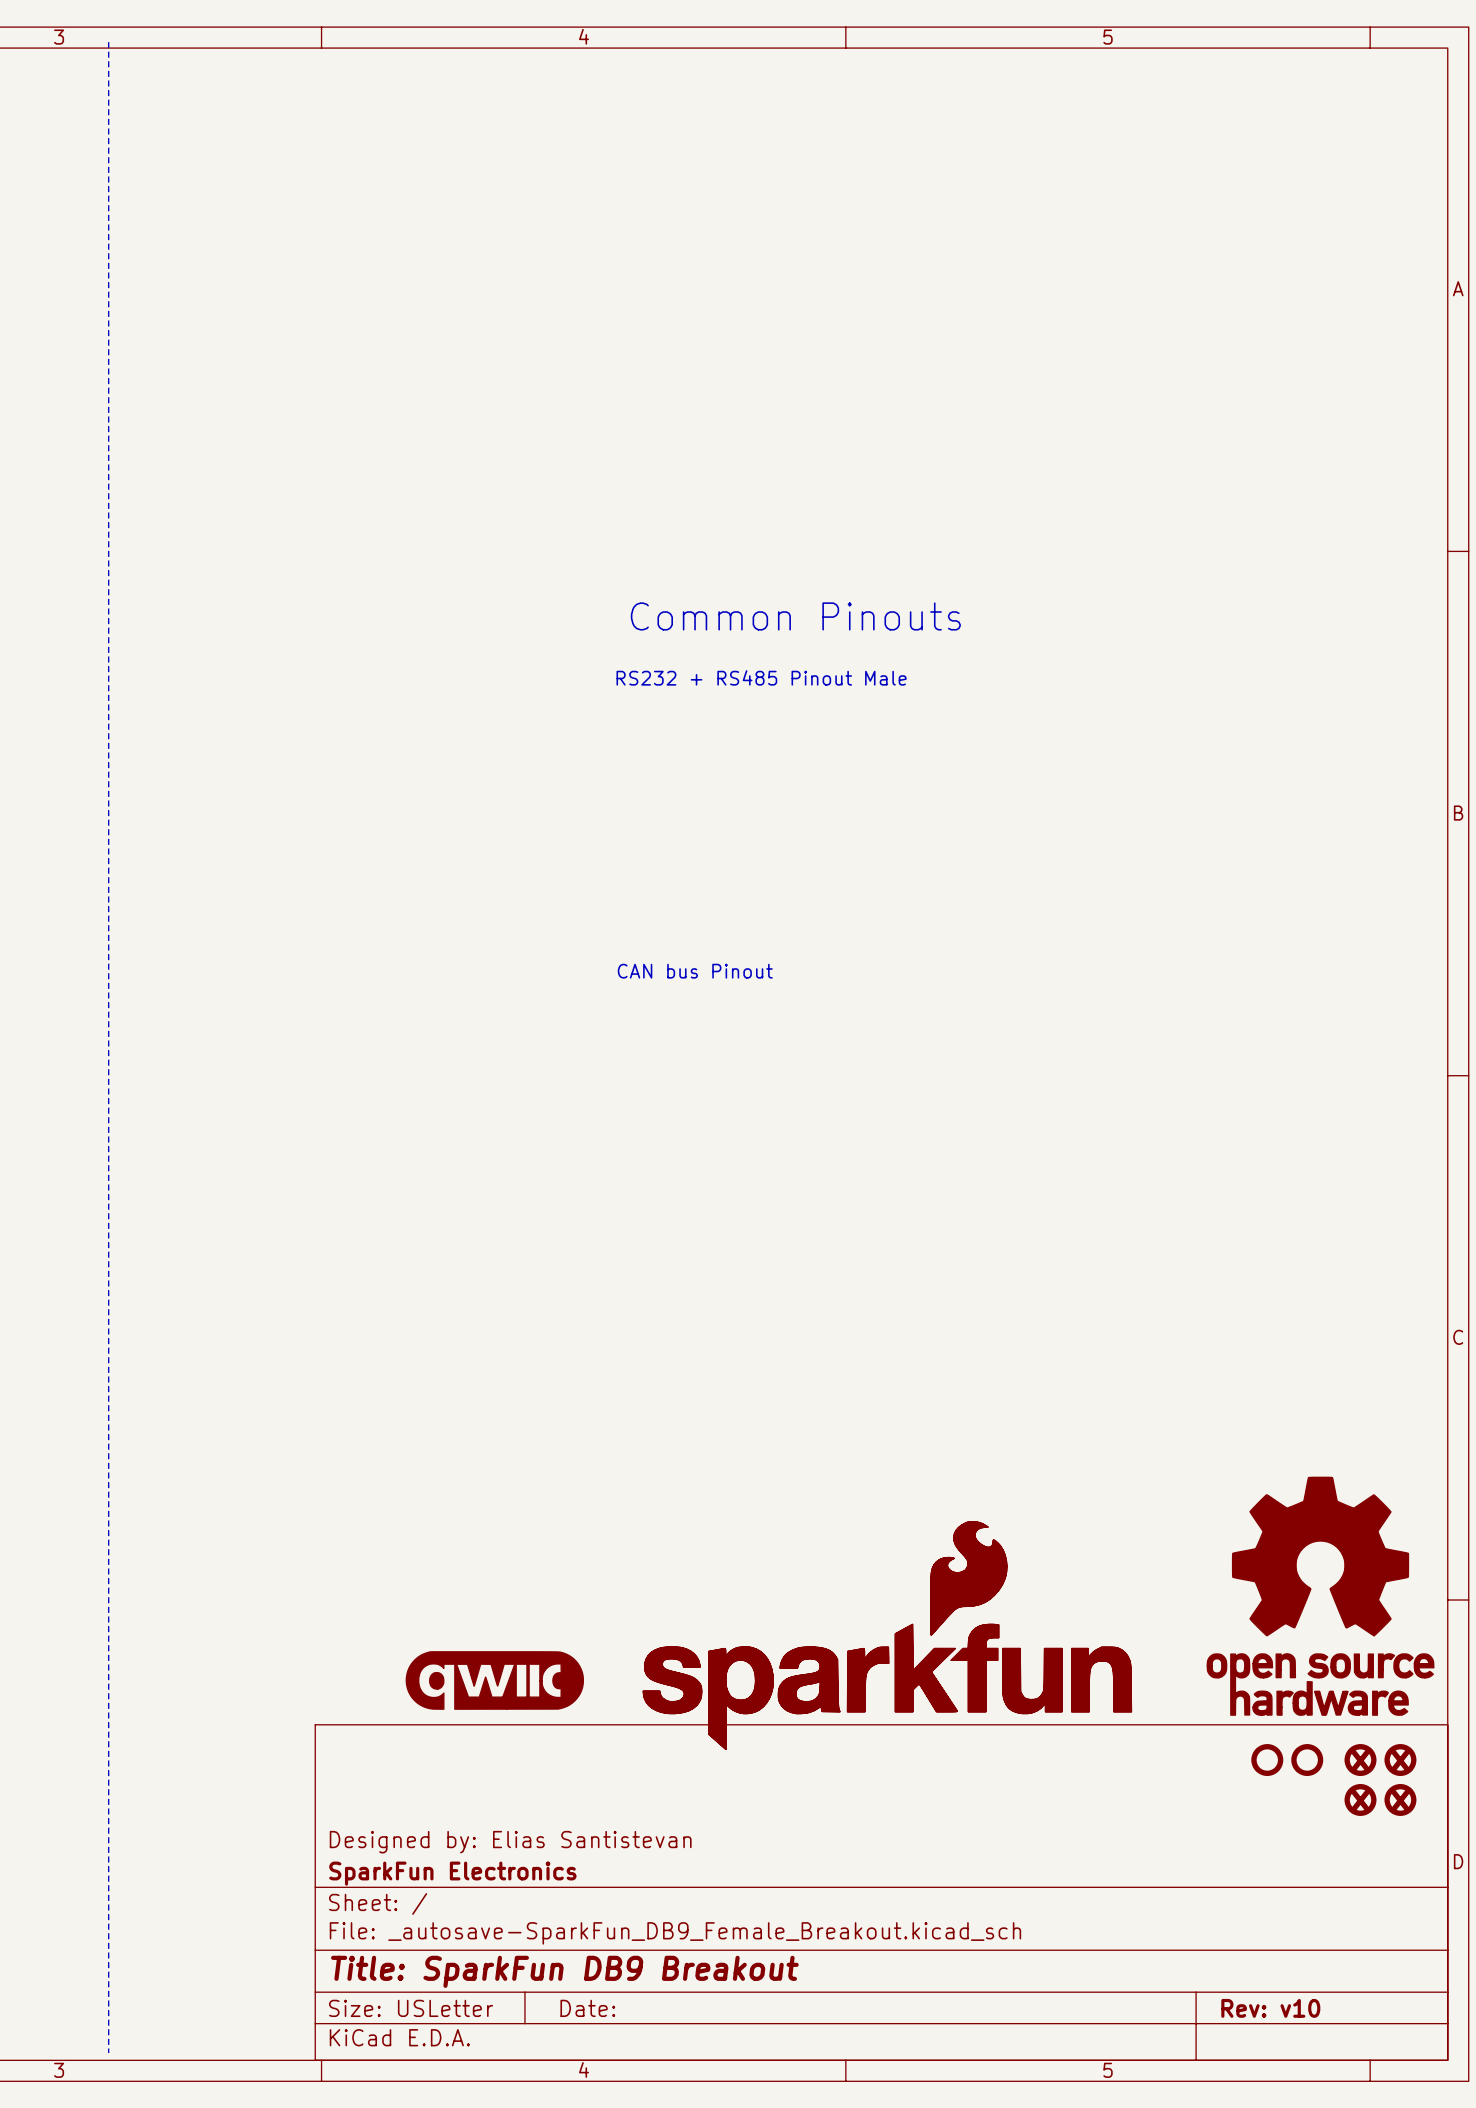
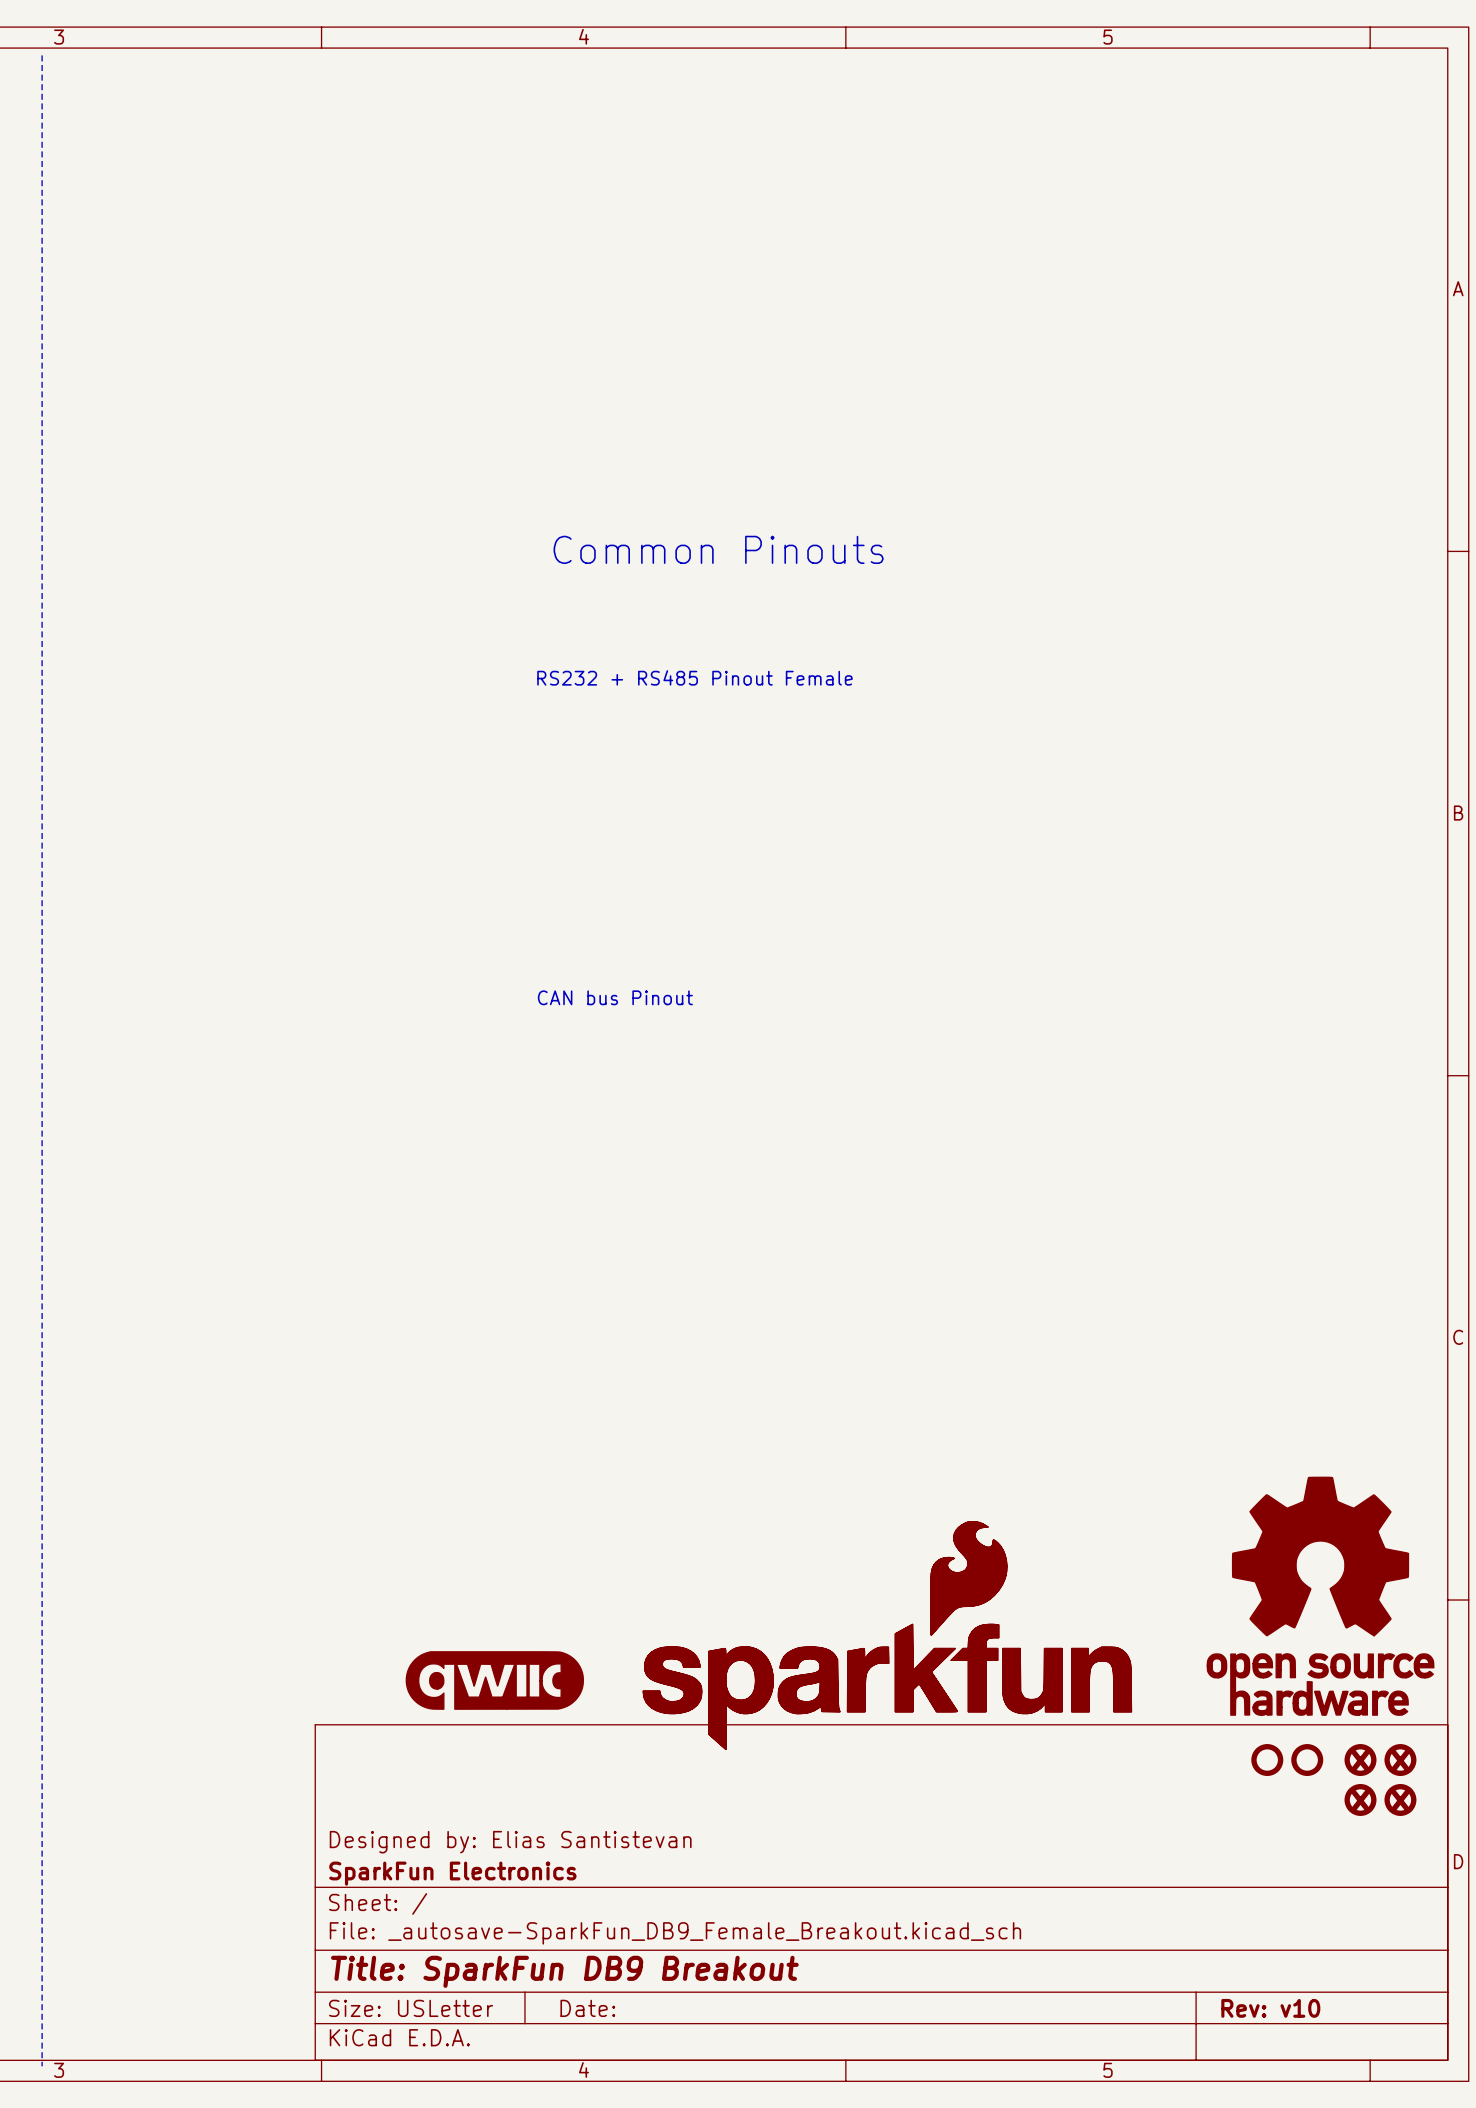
line: (108, 42) (108, 2053) -> (42, 55) (42, 2066)
text position: Common Pinouts (795, 616) -> Common Pinouts (718, 549)
text: RS232 + RS485 Pinout Male (761, 677) -> RS232 + RS485 Pinout Female (694, 677)
text position: CAN bus Pinout (695, 971) -> CAN bus Pinout (615, 997)

